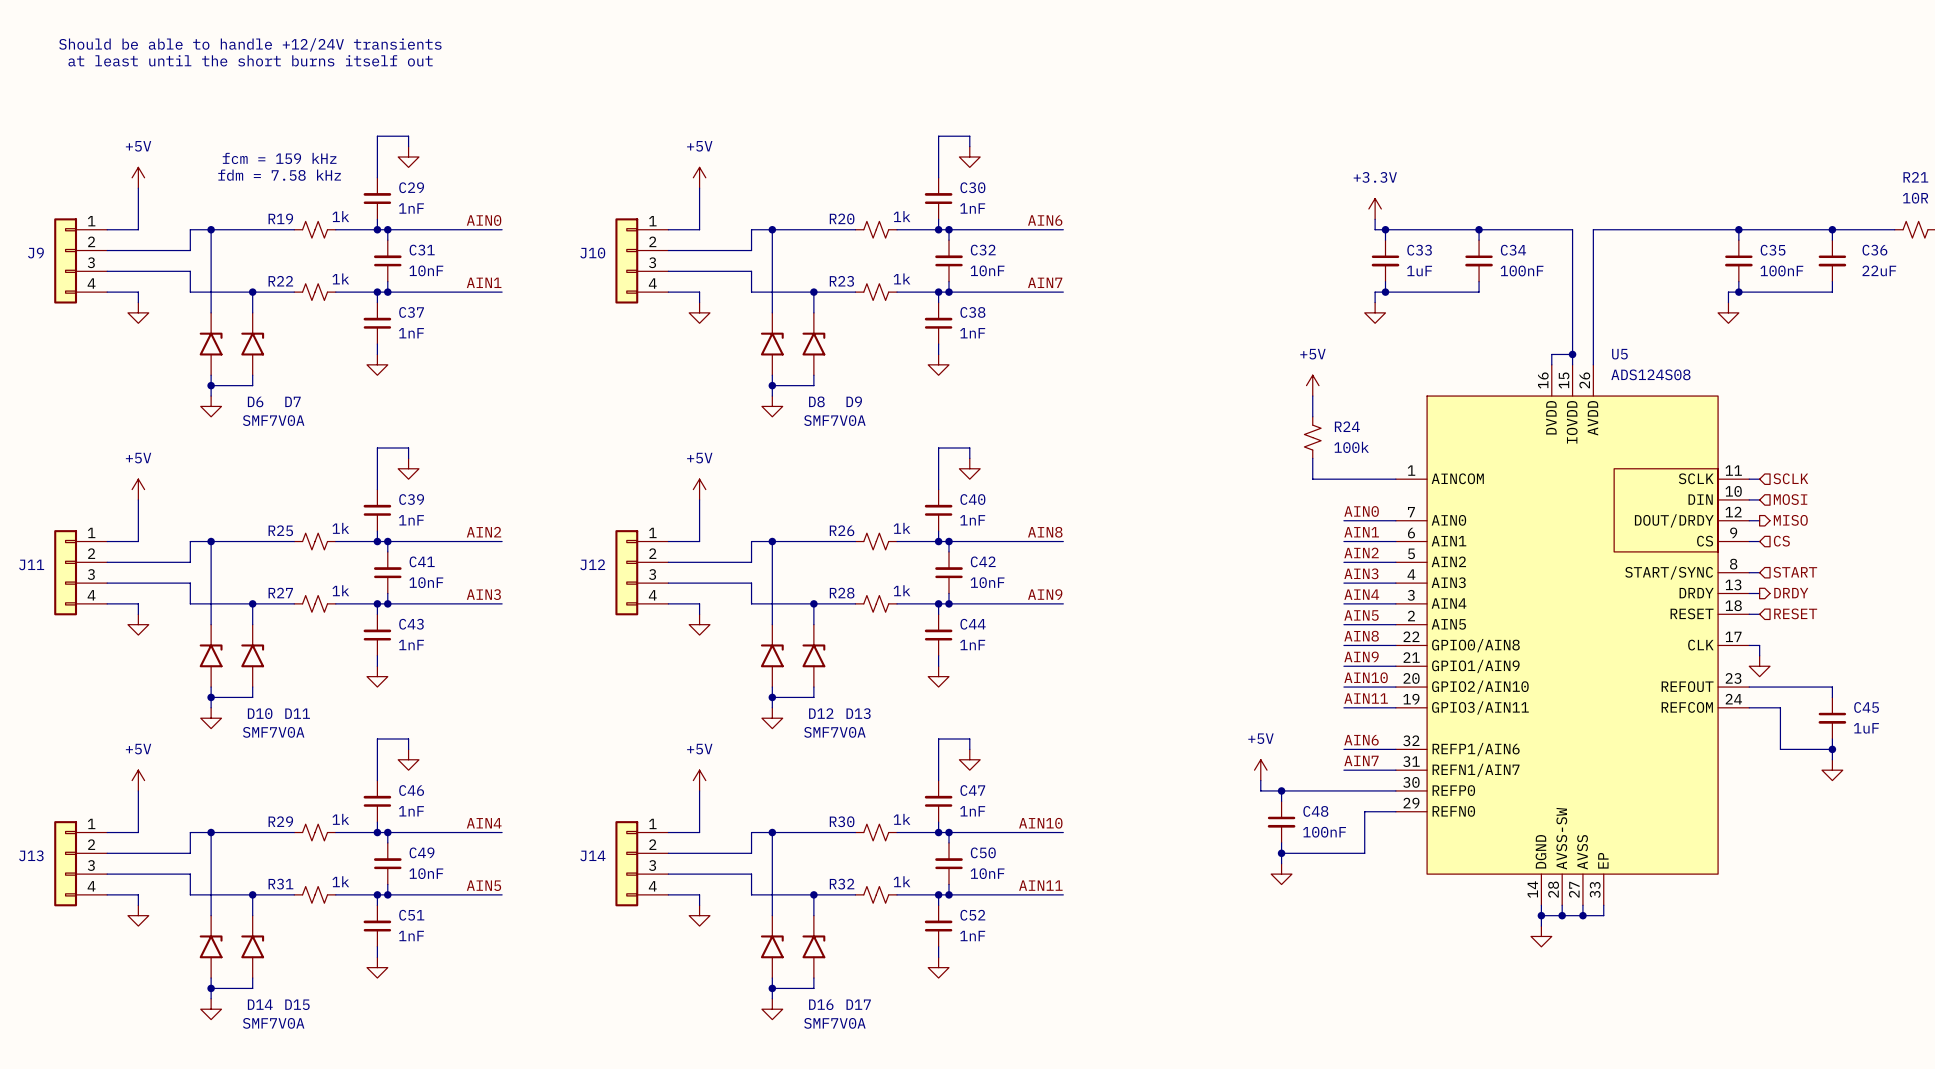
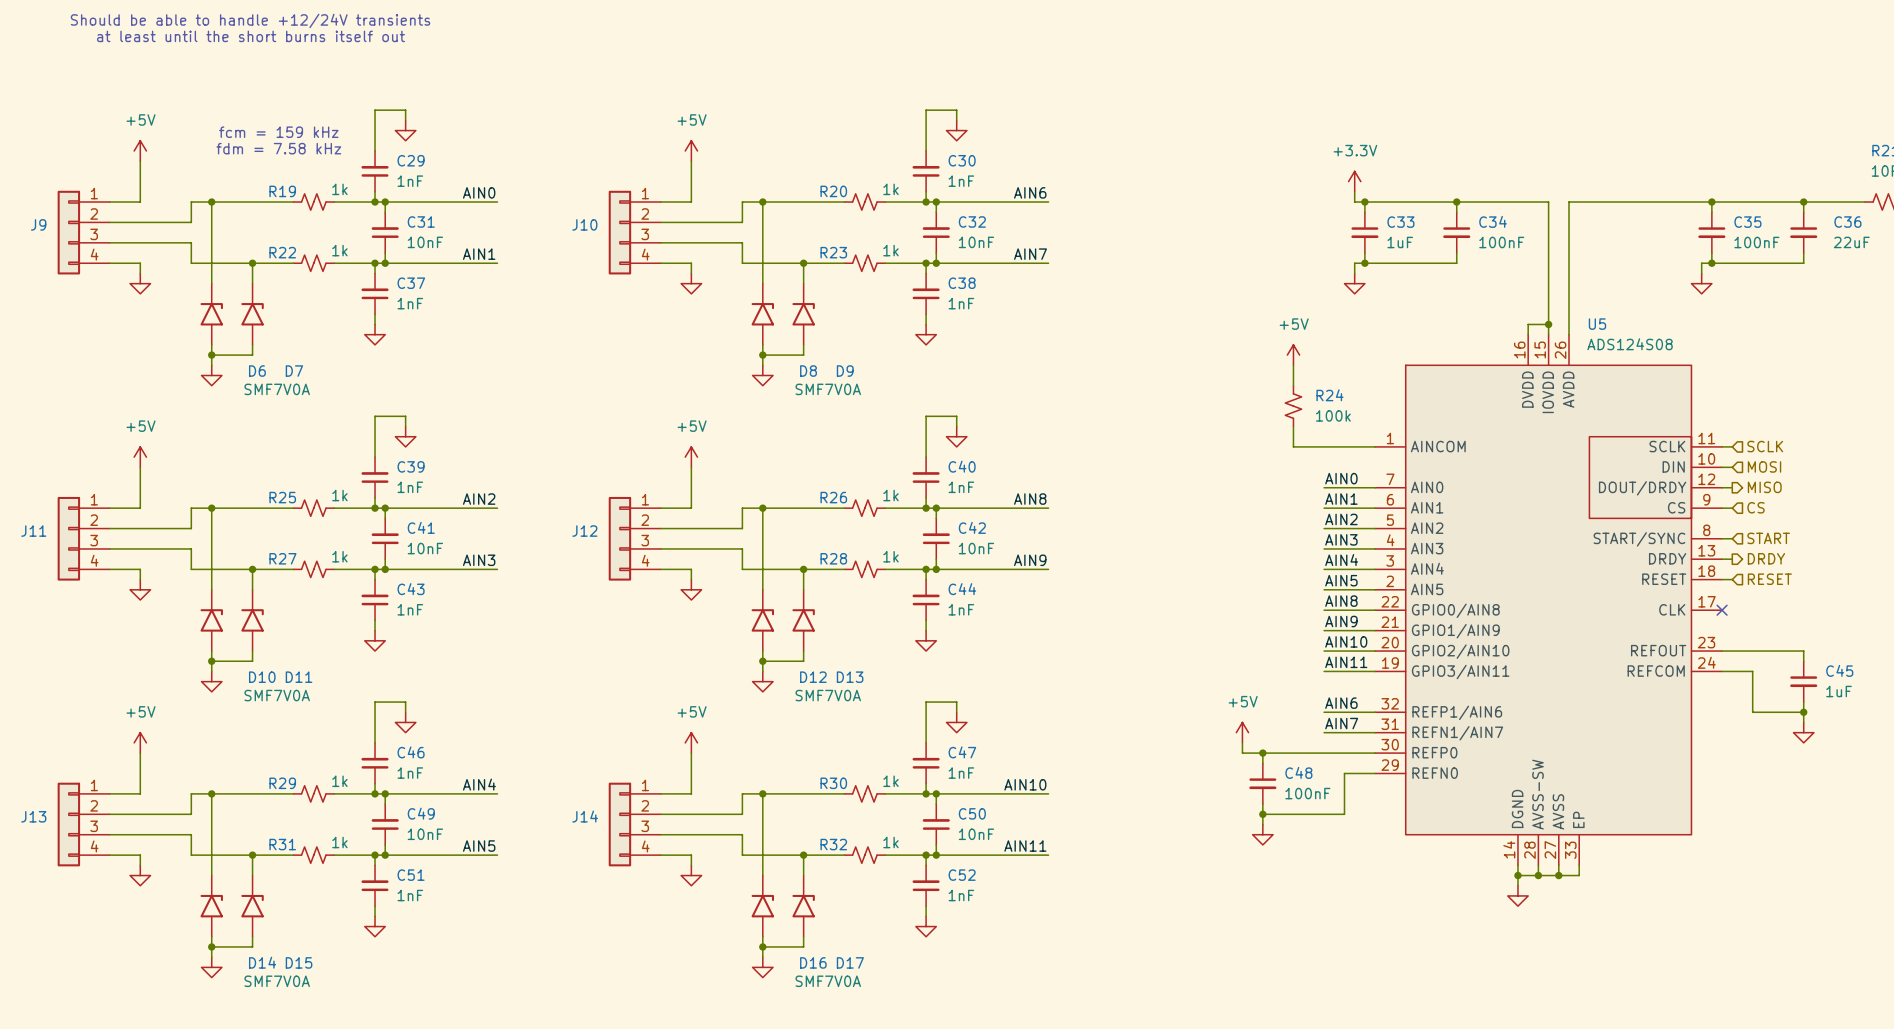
wire: (1749, 645) (1759, 645) (1759, 655) -> none
no-connect mark: none -> (1722, 610)
power symbol: (1759, 666) -> none

